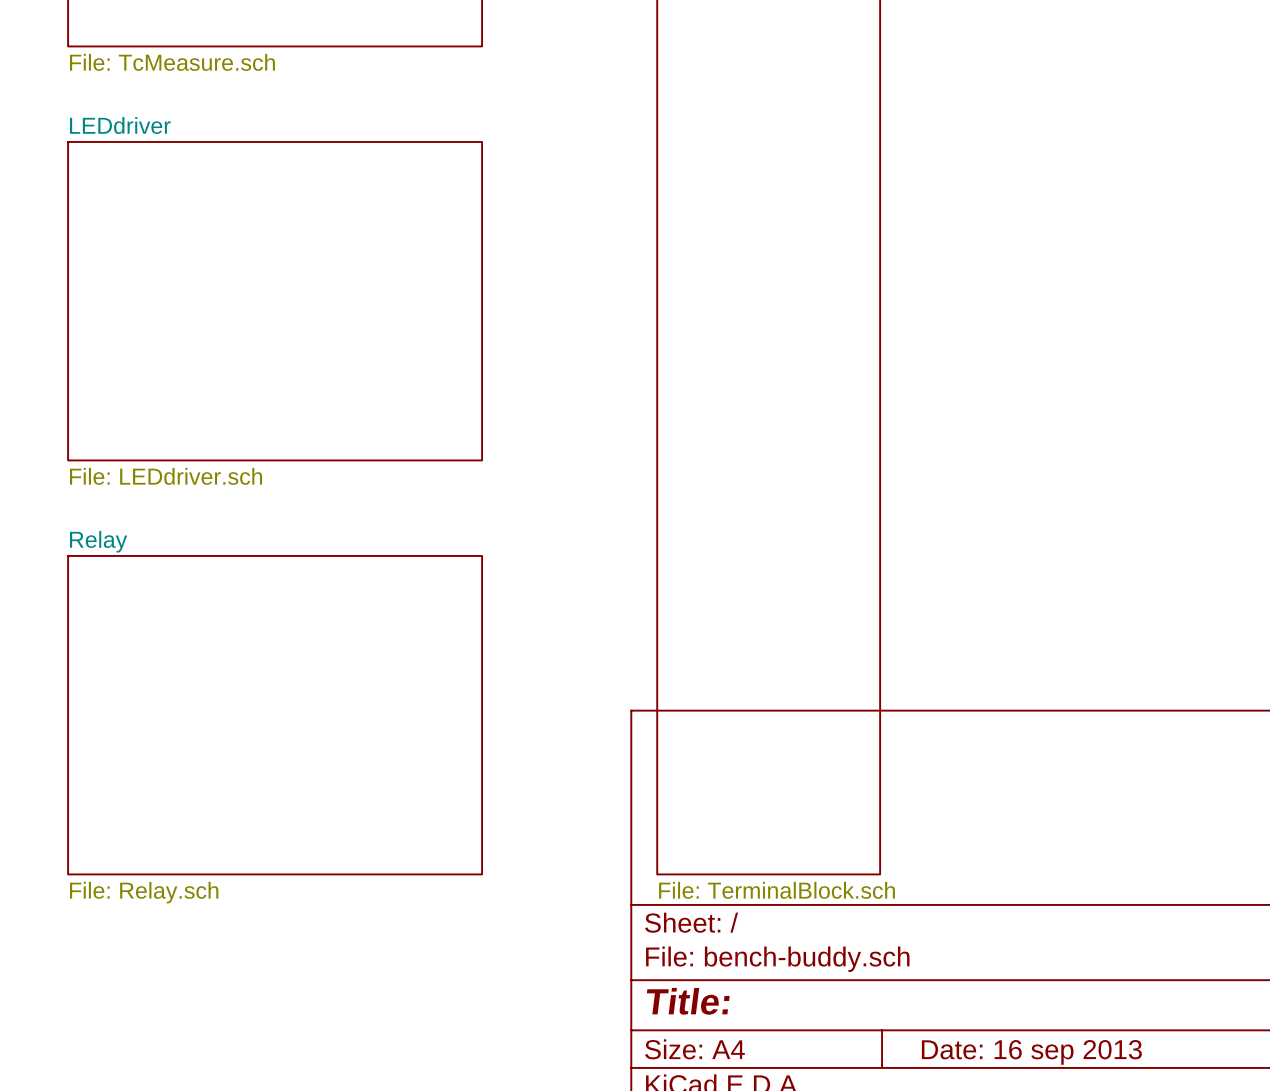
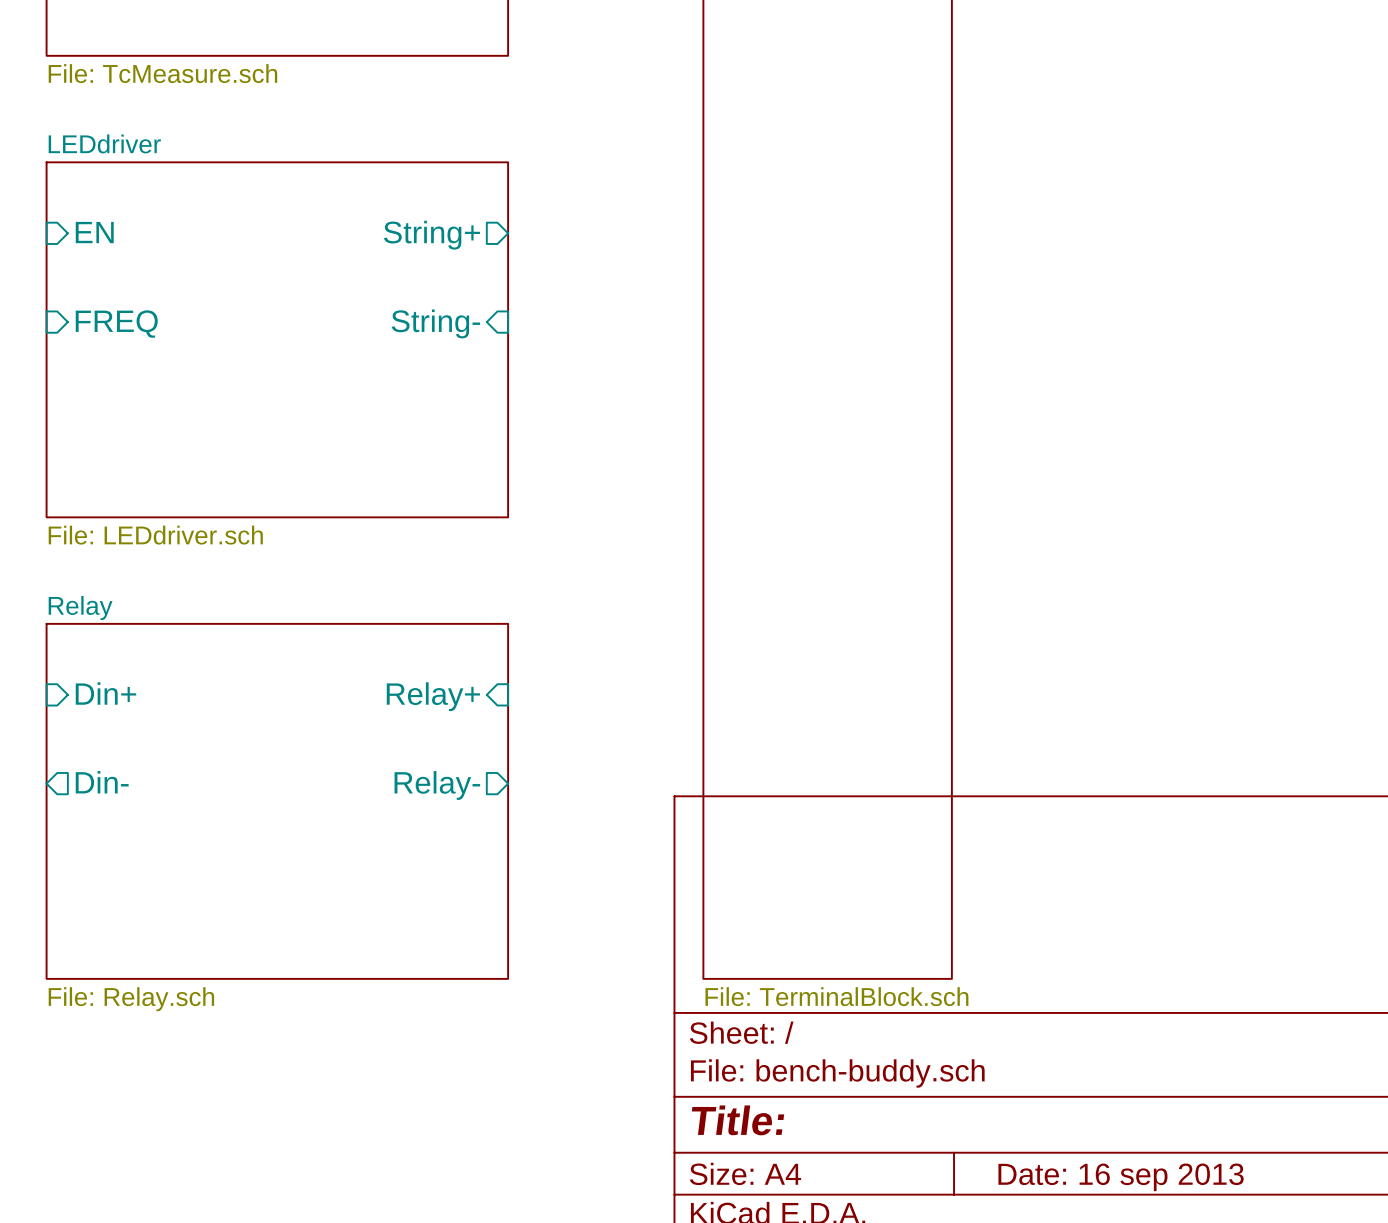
sheet pin: none -> EN (94, 232)
sheet pin: none -> String+ (431, 235)
sheet pin: none -> String- (435, 323)
sheet pin: none -> FREQ (116, 324)
sheet pin: none -> Din+ (105, 693)
sheet pin: none -> Relay+ (433, 696)
sheet pin: none -> Din- (102, 782)
sheet pin: none -> Relay- (437, 785)

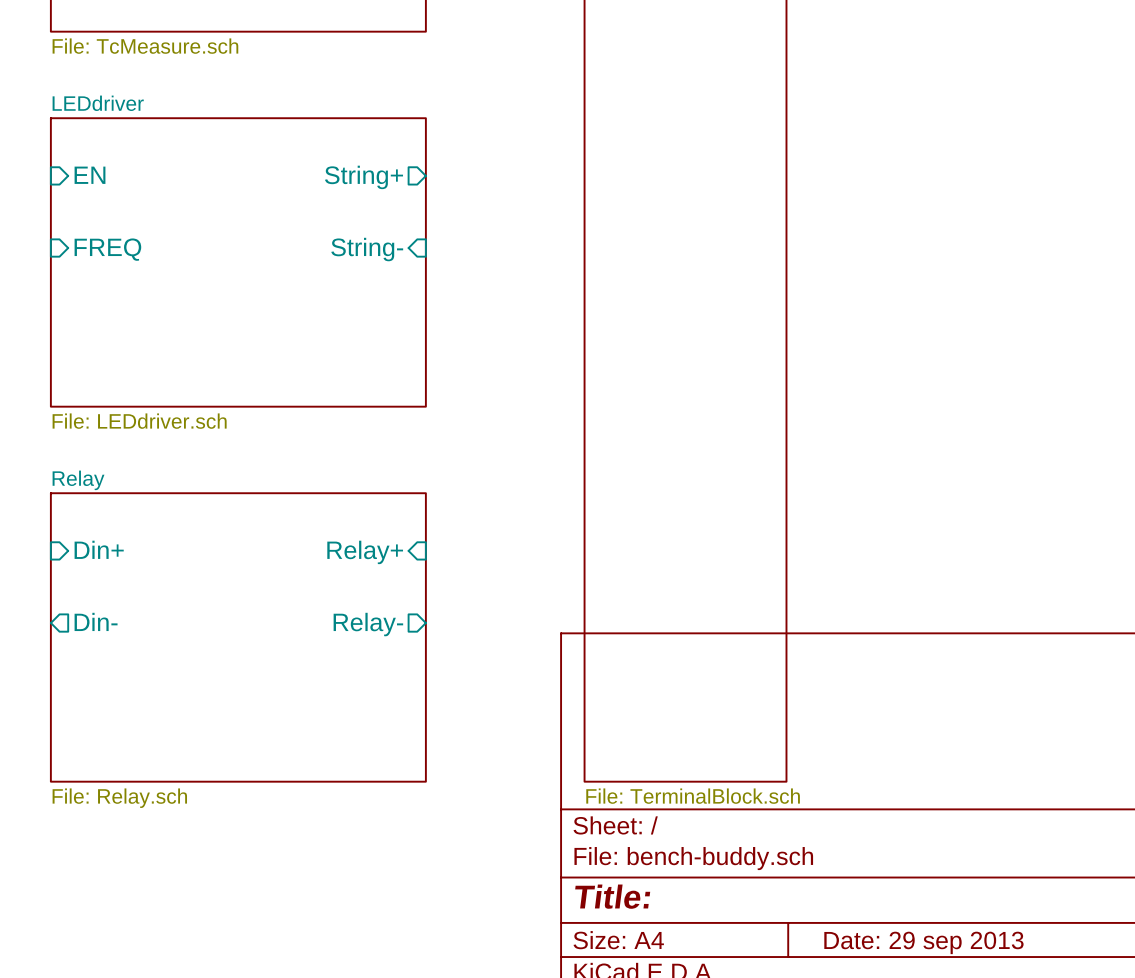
title block: Date: 16 sep 2013 (1121, 1177) -> Date: 29 sep 2013 (923, 942)

